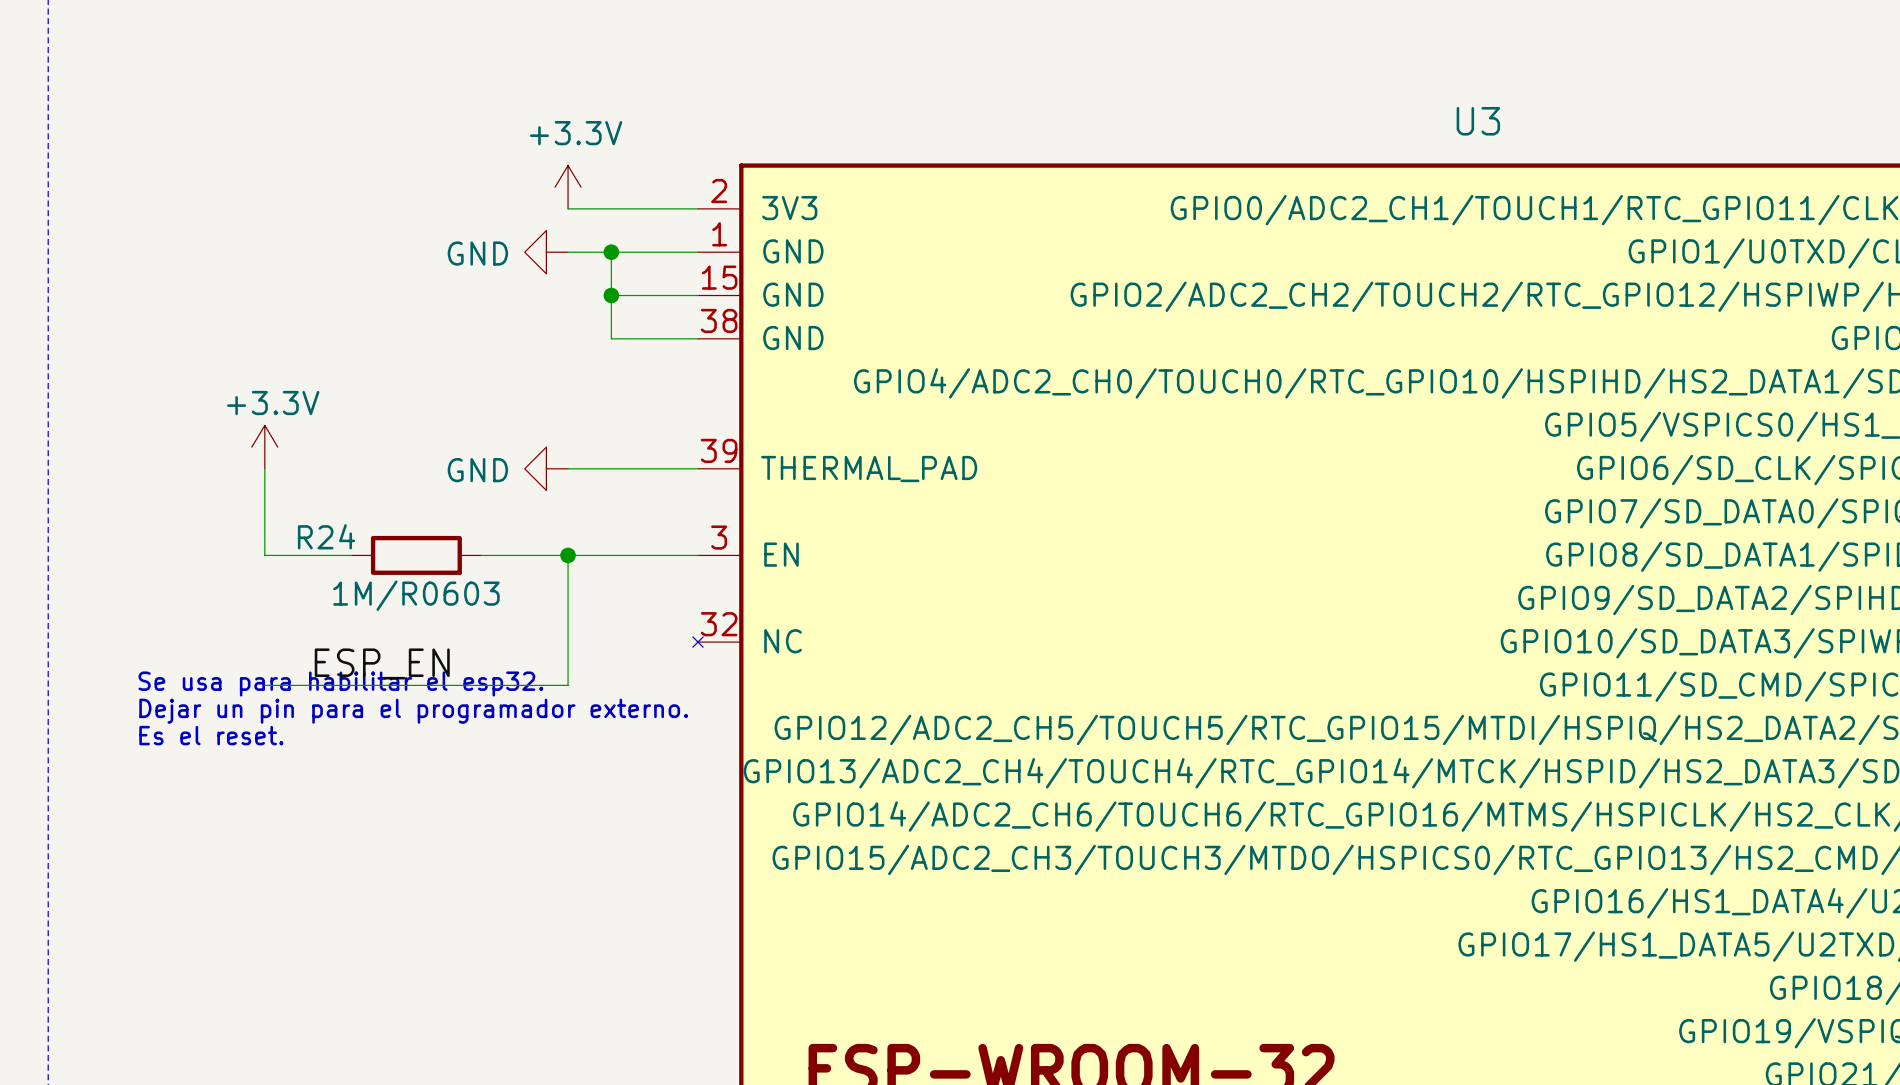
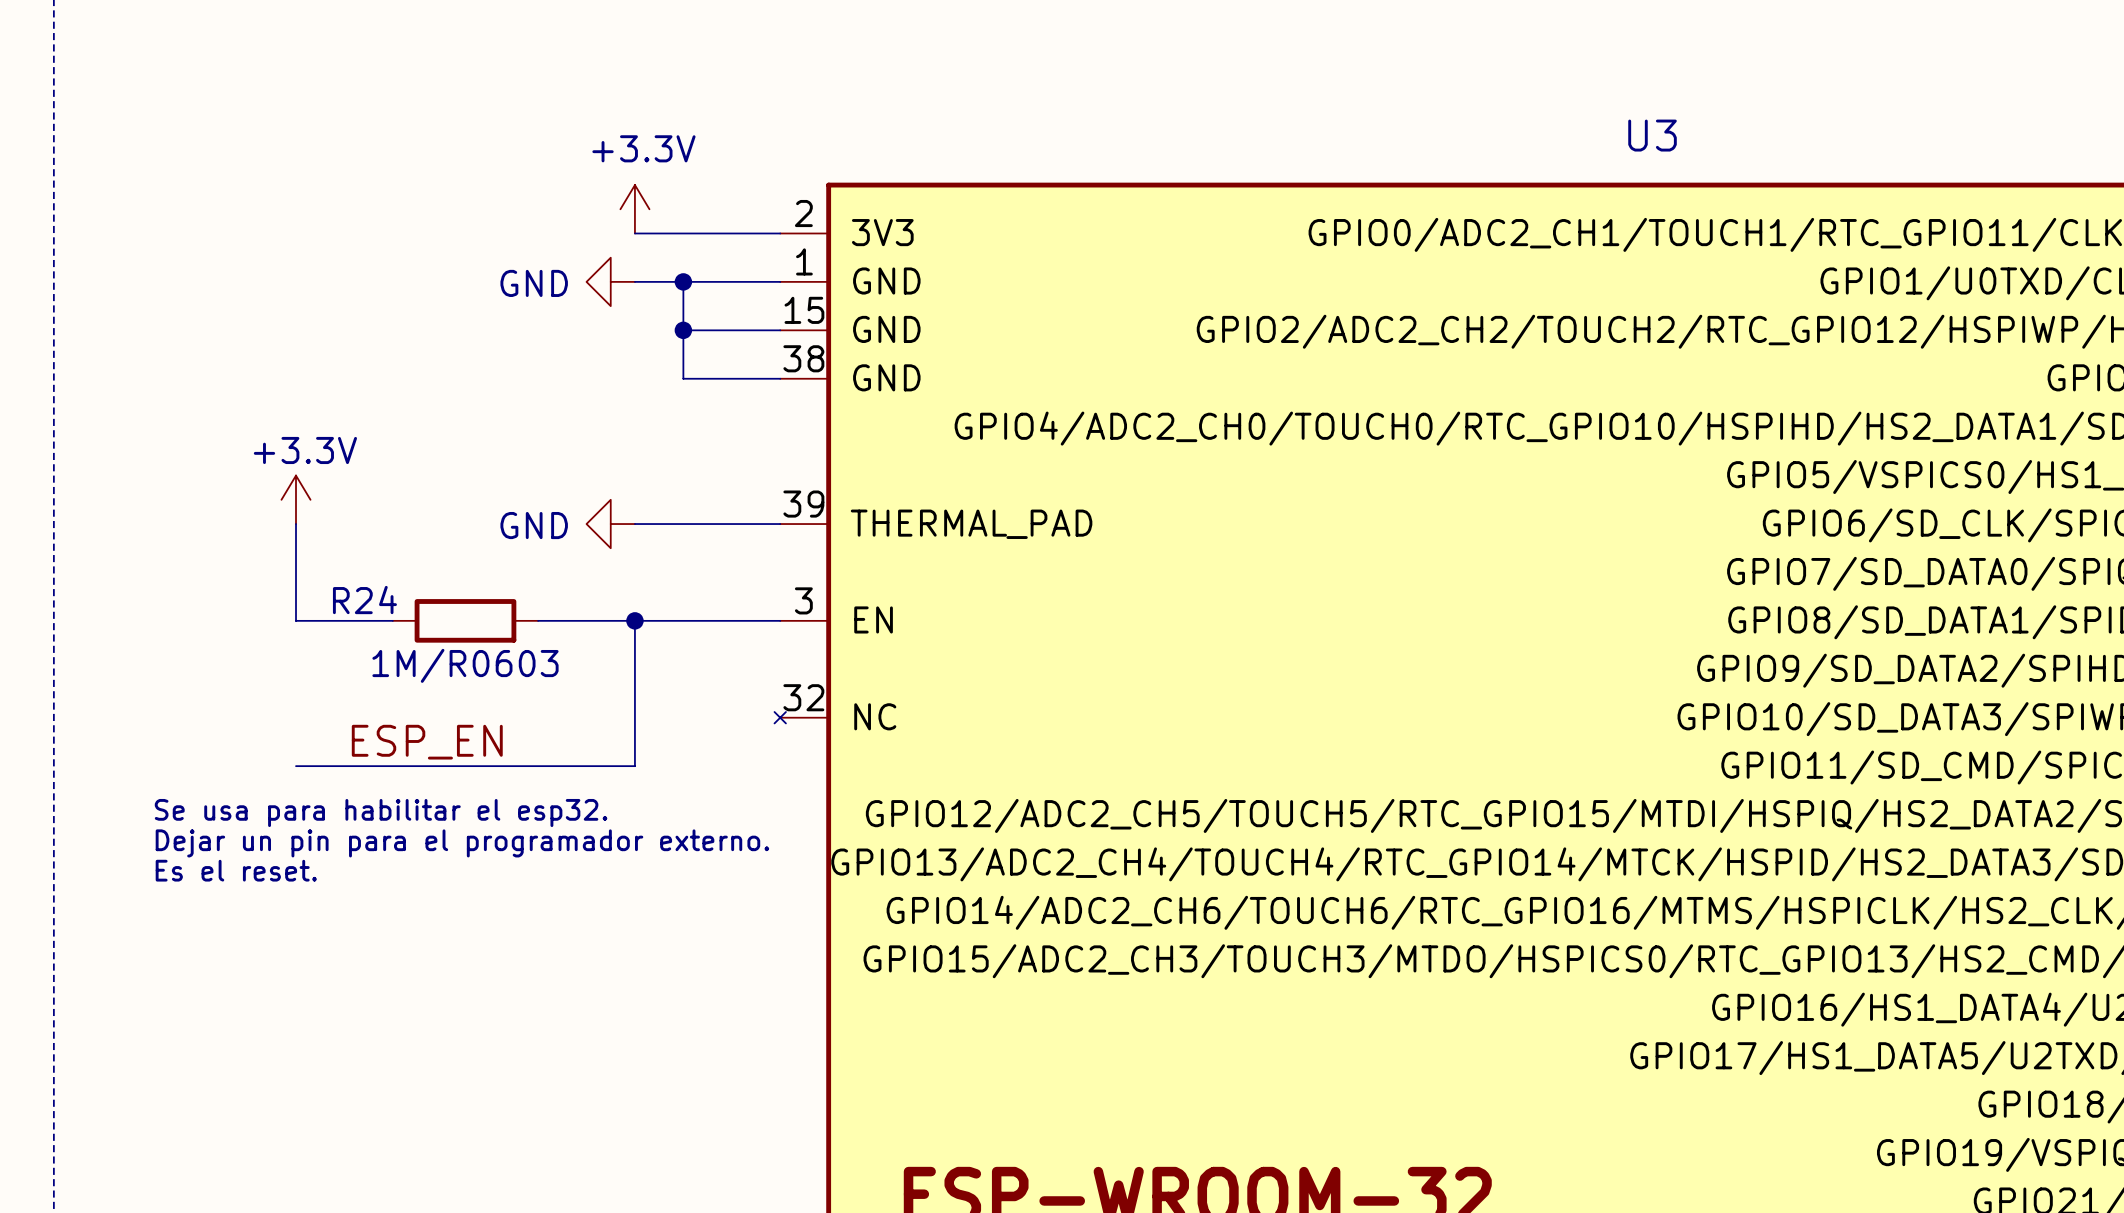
text position: Se usa para habilitar el esp32. (340, 684) -> Se usa para habilitar el esp32. (381, 813)
text position: Dejar un pin para el programador externo. (413, 711) -> Dejar un pin para el programador externo. (462, 843)
text position: Es el reset. (211, 735) -> Es el reset. (236, 870)

